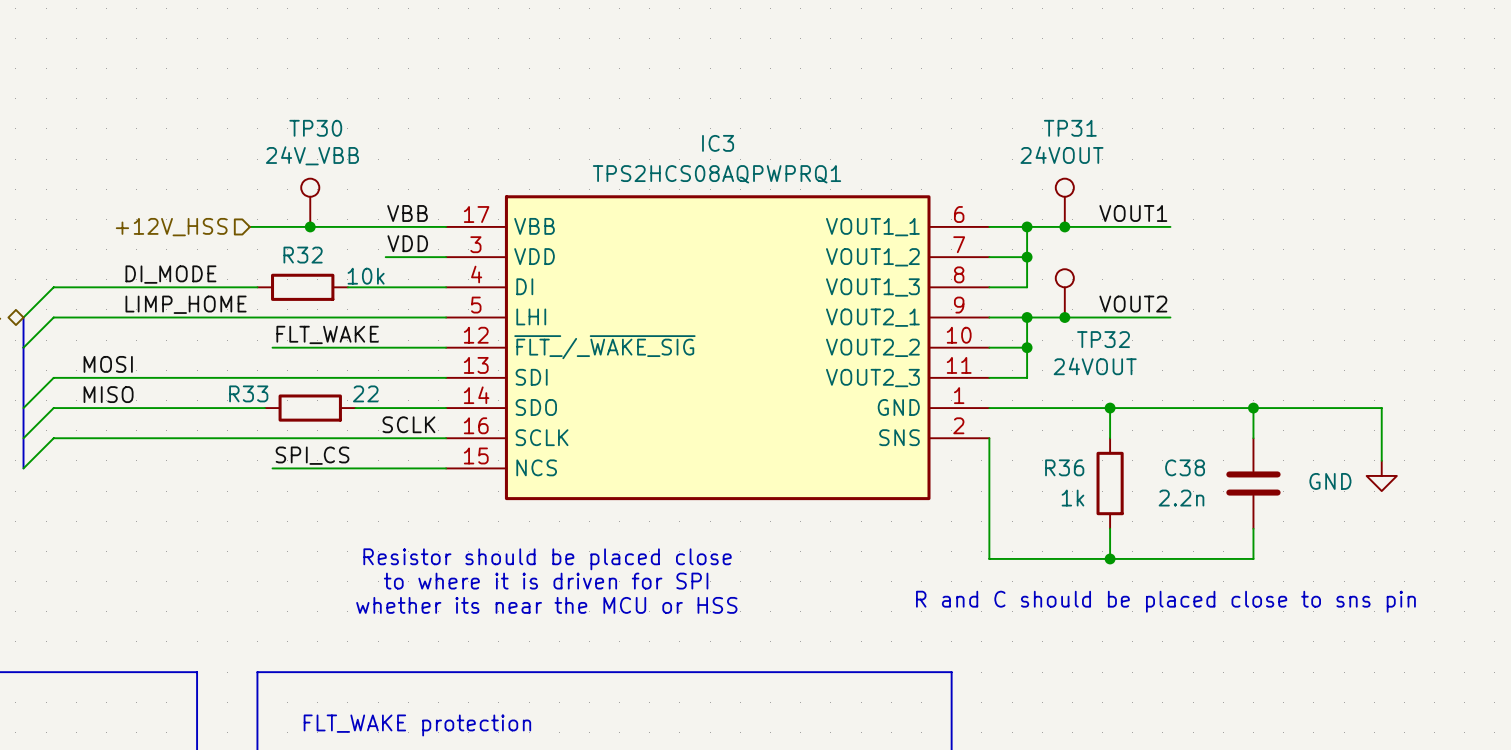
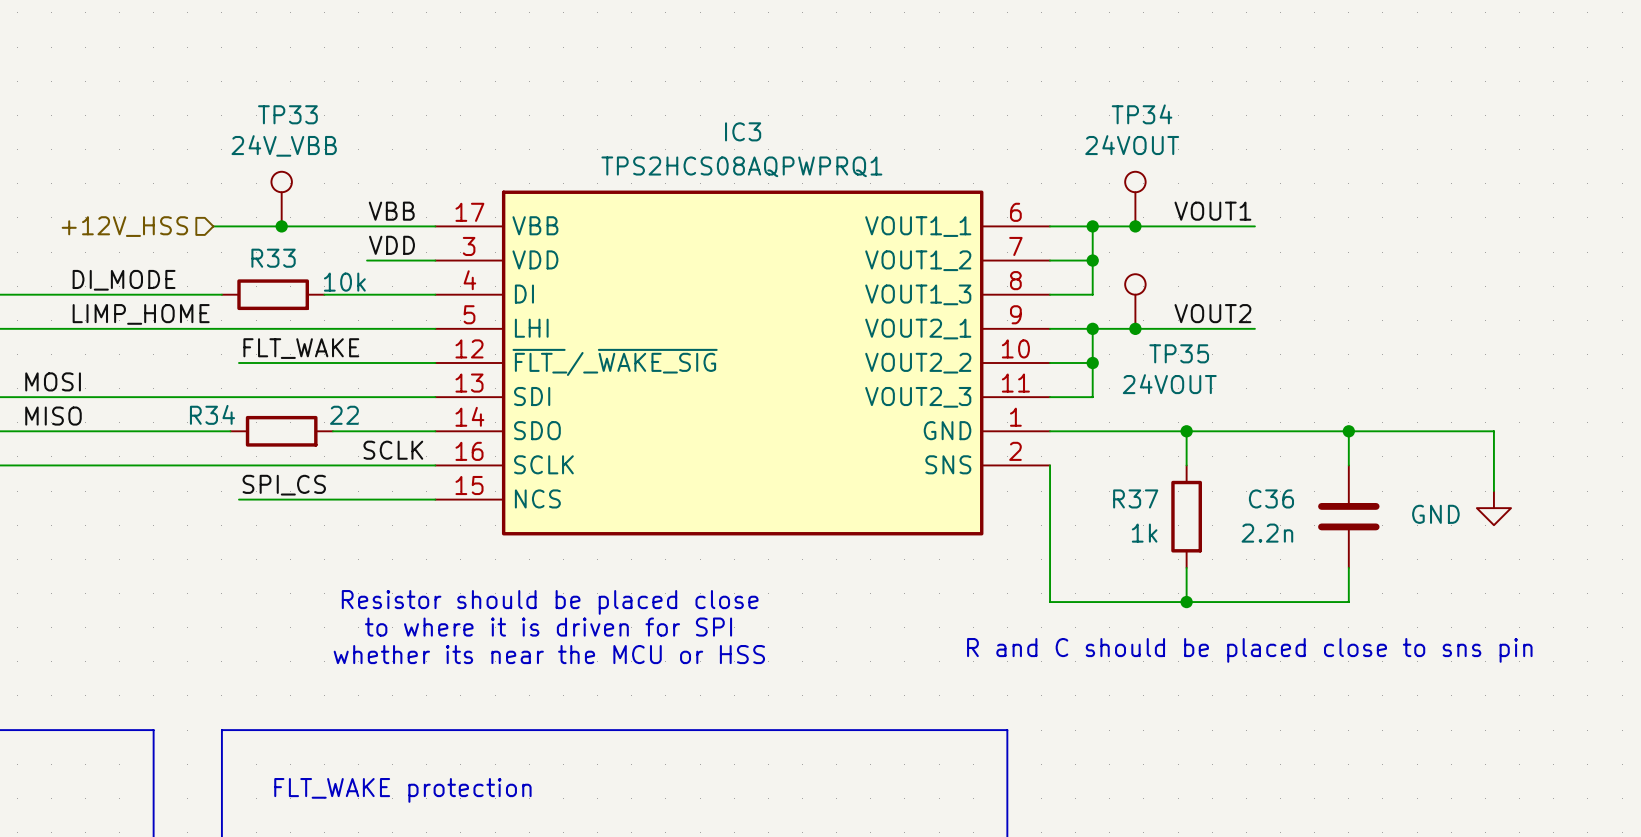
TP30 name: TP30 (315, 128) -> TP33 (287, 114)
TP31 name: TP31 (1070, 128) -> TP34 (1142, 114)
R32 name: R32 (303, 255) -> R33 (273, 258)
TP32 name: TP32 (1103, 339) -> TP35 (1179, 353)
R33 name: R33 (248, 393) -> R34 (212, 414)
R36 name: R36 (1064, 467) -> R37 (1135, 498)
C38 name: C38 (1185, 467) -> C36 (1271, 498)

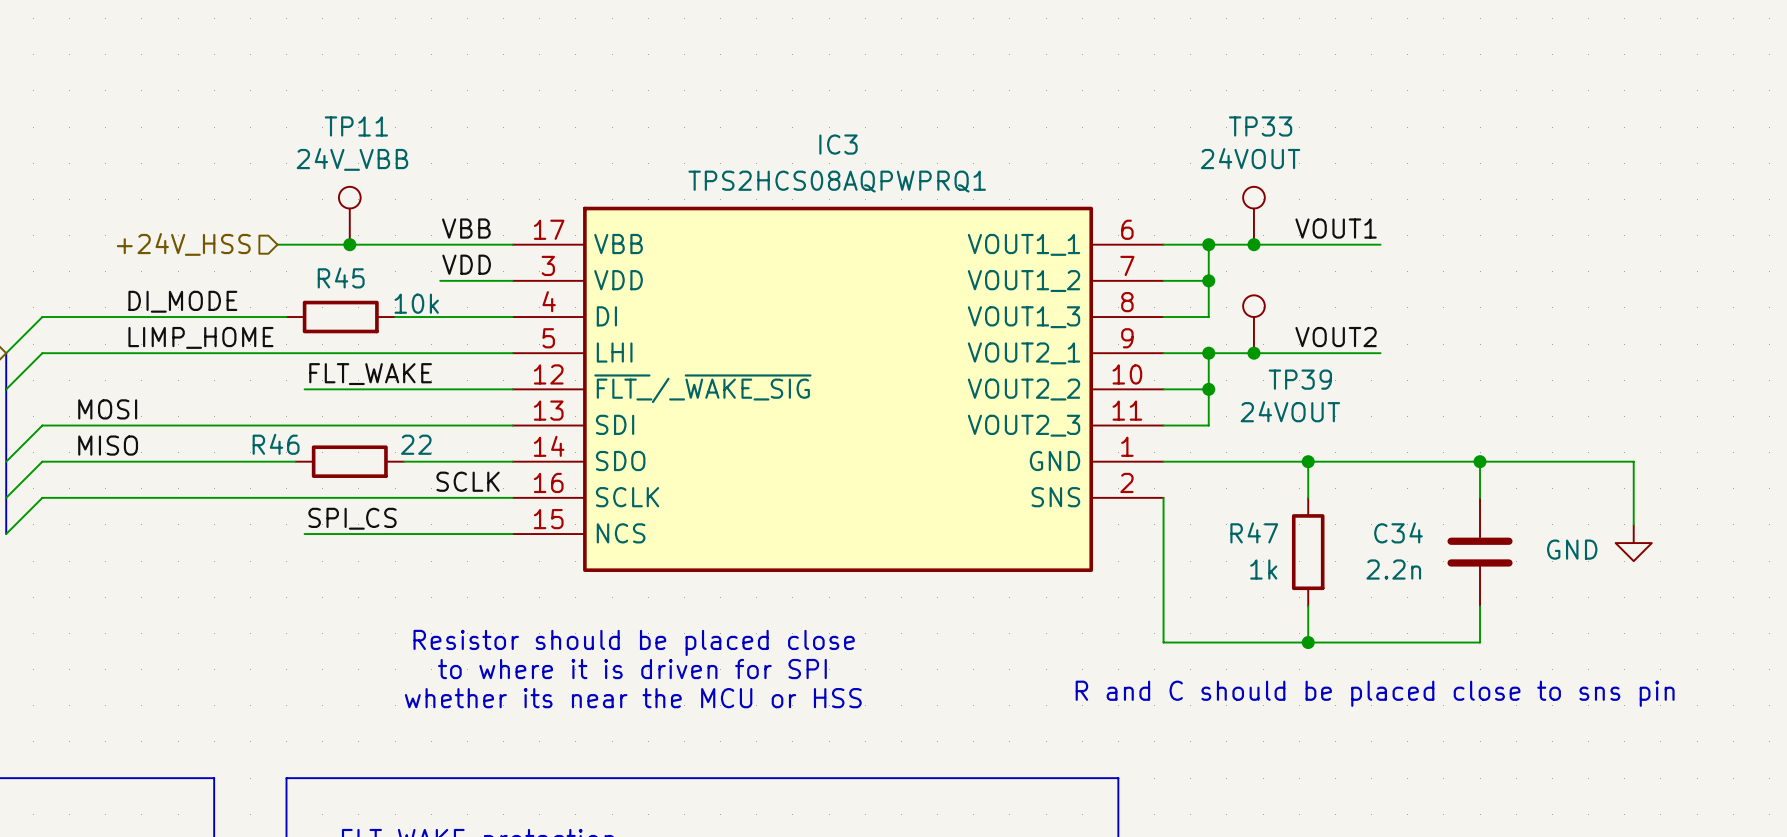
TP33 name: TP33 (287, 114) -> TP11 (356, 126)
TP34 name: TP34 (1142, 114) -> TP33 (1260, 126)
hierarchical label: +12V_HSS (124, 226) -> +24V_HSS (183, 244)
R33 name: R33 (273, 258) -> R45 (341, 277)
TP35 name: TP35 (1179, 353) -> TP39 (1300, 379)
R34 name: R34 (212, 414) -> R46 (276, 444)
R37 name: R37 (1135, 498) -> R47 (1254, 532)
C36 name: C36 (1271, 498) -> C34 (1398, 532)

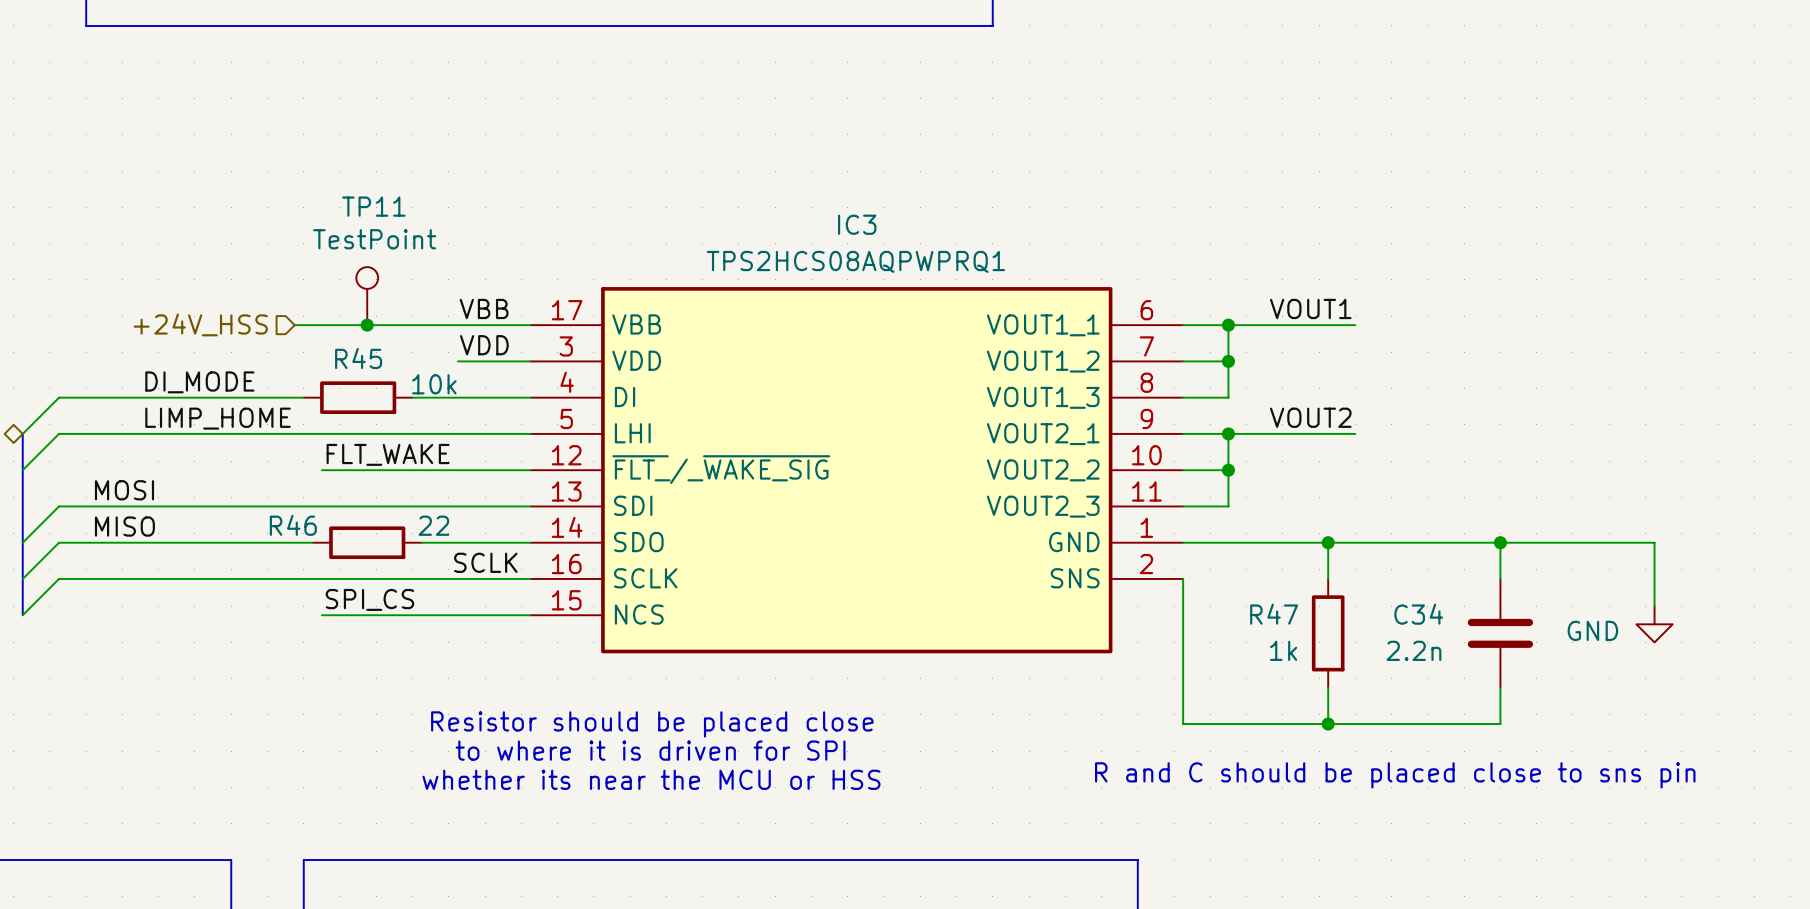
TP11 value: 24V_VBB (352, 159) -> TestPoint (374, 239)
TP33: 24VOUT (1253, 215) -> none
label position: VOUT1 (1336, 228) -> VOUT1 (1310, 308)
junction: (1253, 244) -> none
wire: (1335, 244) (1380, 244) -> none
TP39: 24VOUT (1253, 324) -> none
label position: VOUT2 (1336, 337) -> VOUT2 (1310, 417)
junction: (1253, 353) -> none
wire: (1335, 353) (1380, 353) -> none

